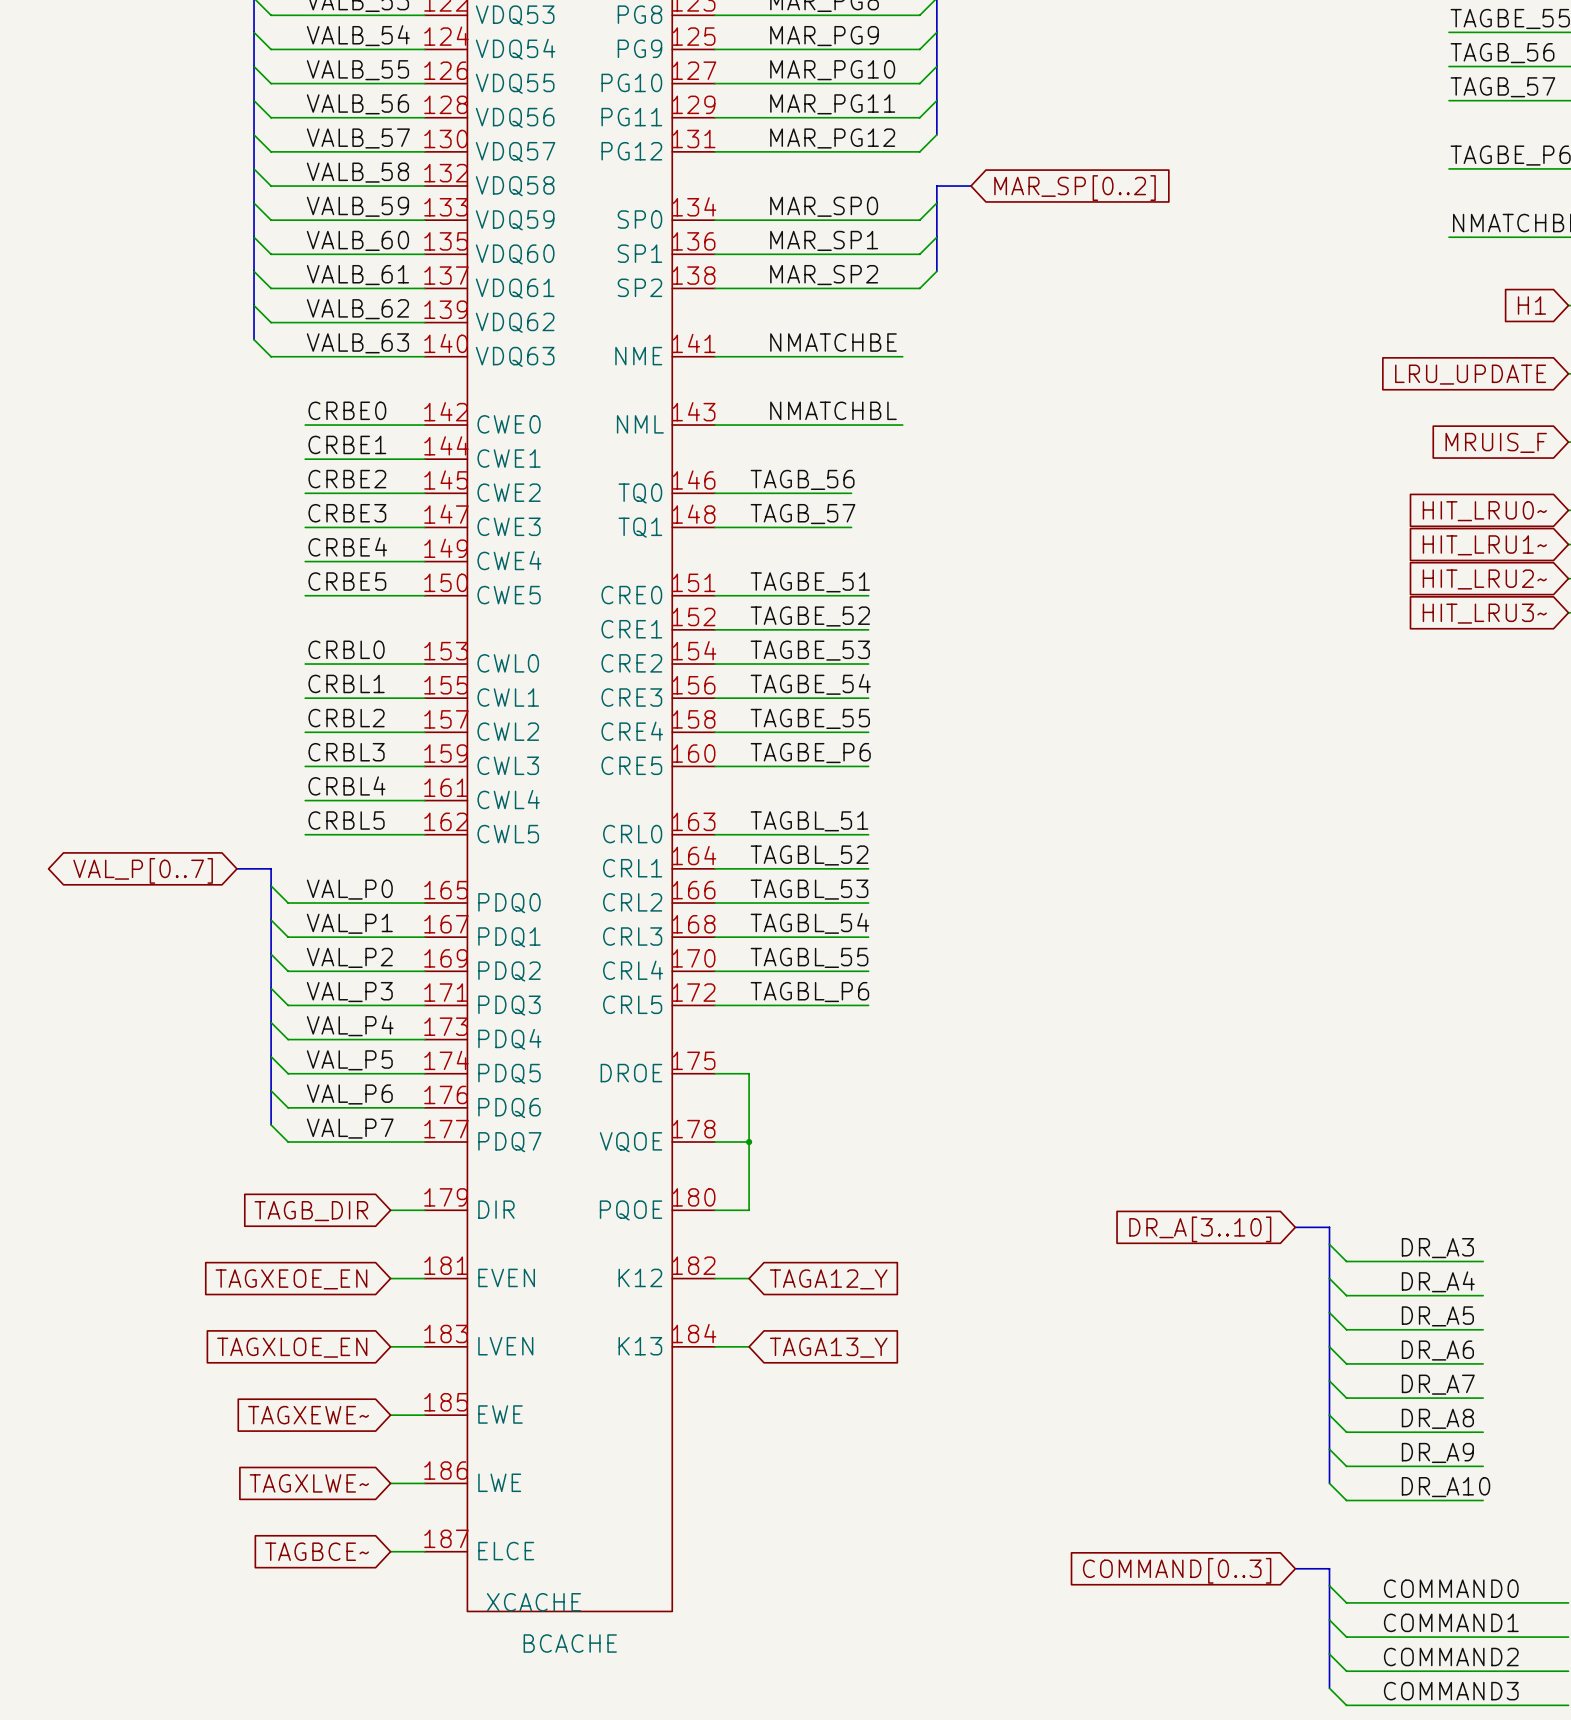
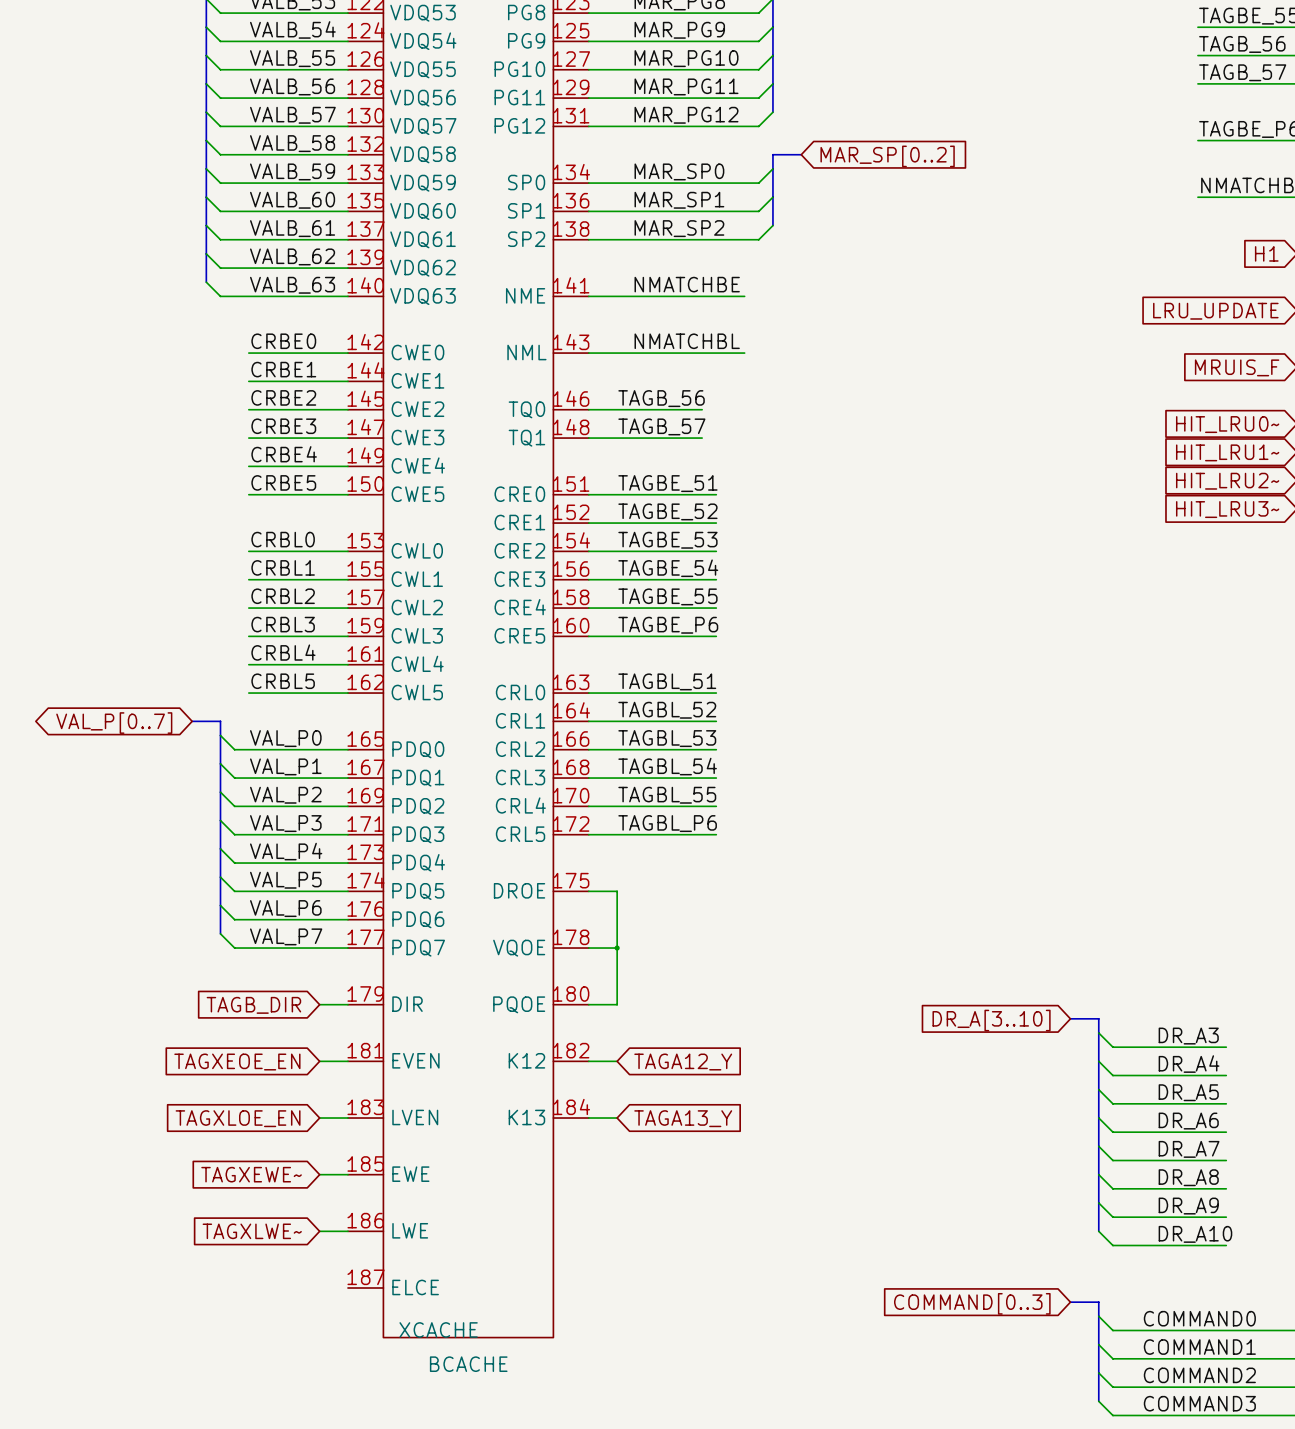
global label: TAGBCE~ (317, 1551) -> none
wire: (390, 1551) (424, 1551) -> none

